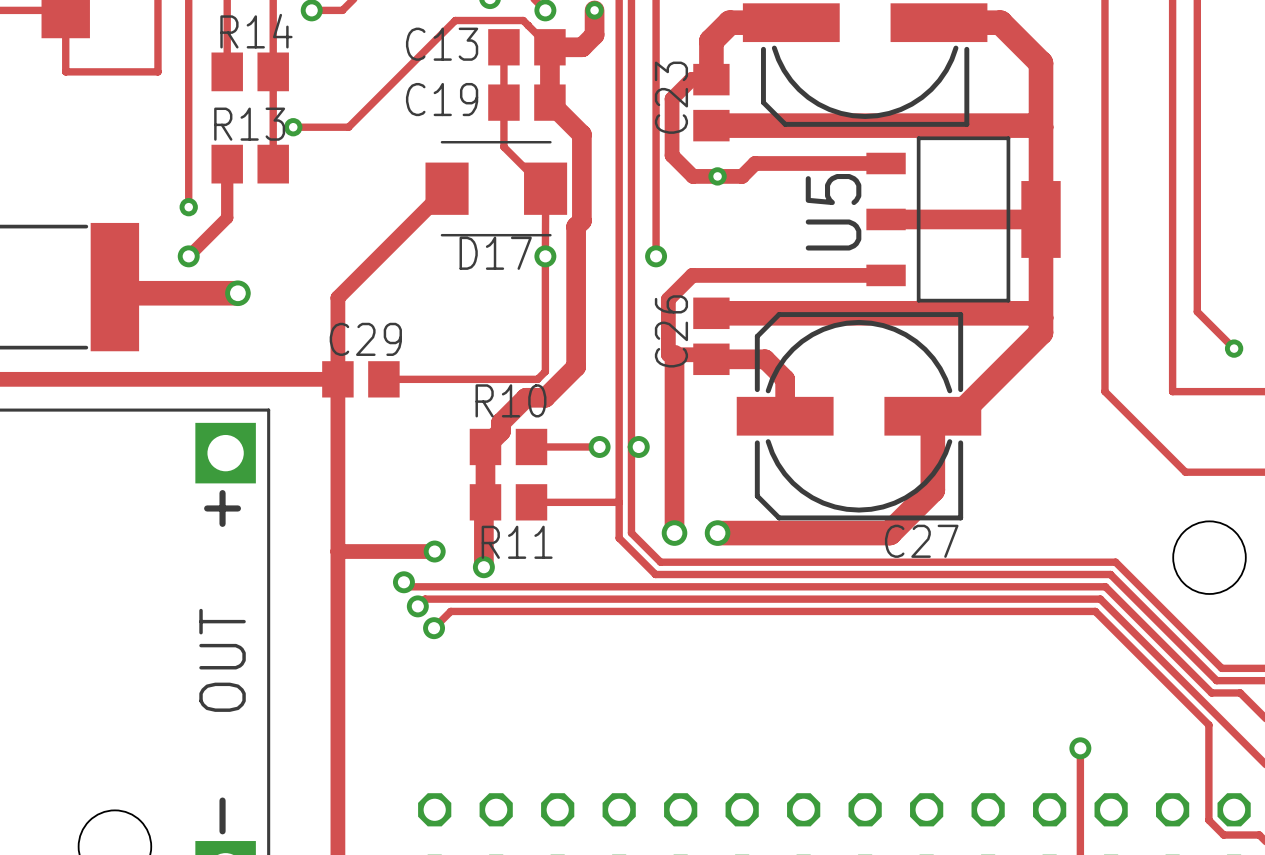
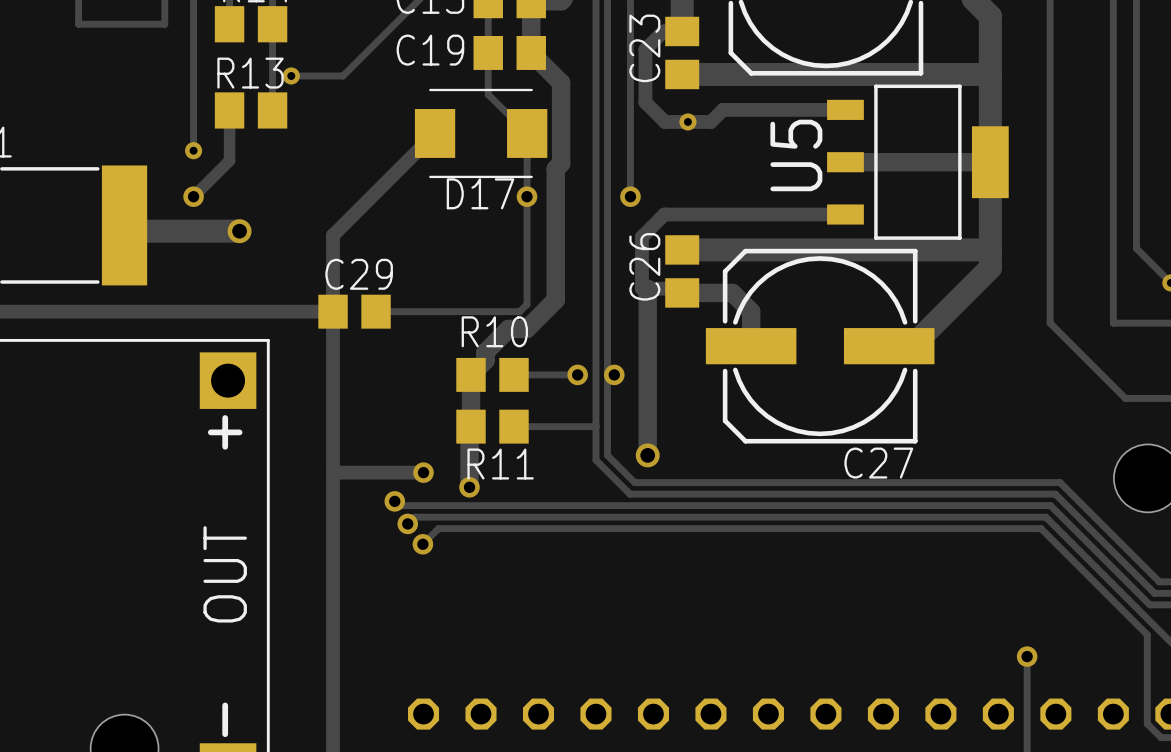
track: (932, 416) (932, 489) (889, 533) (717, 533) -> none
via: (717, 533) -> none

